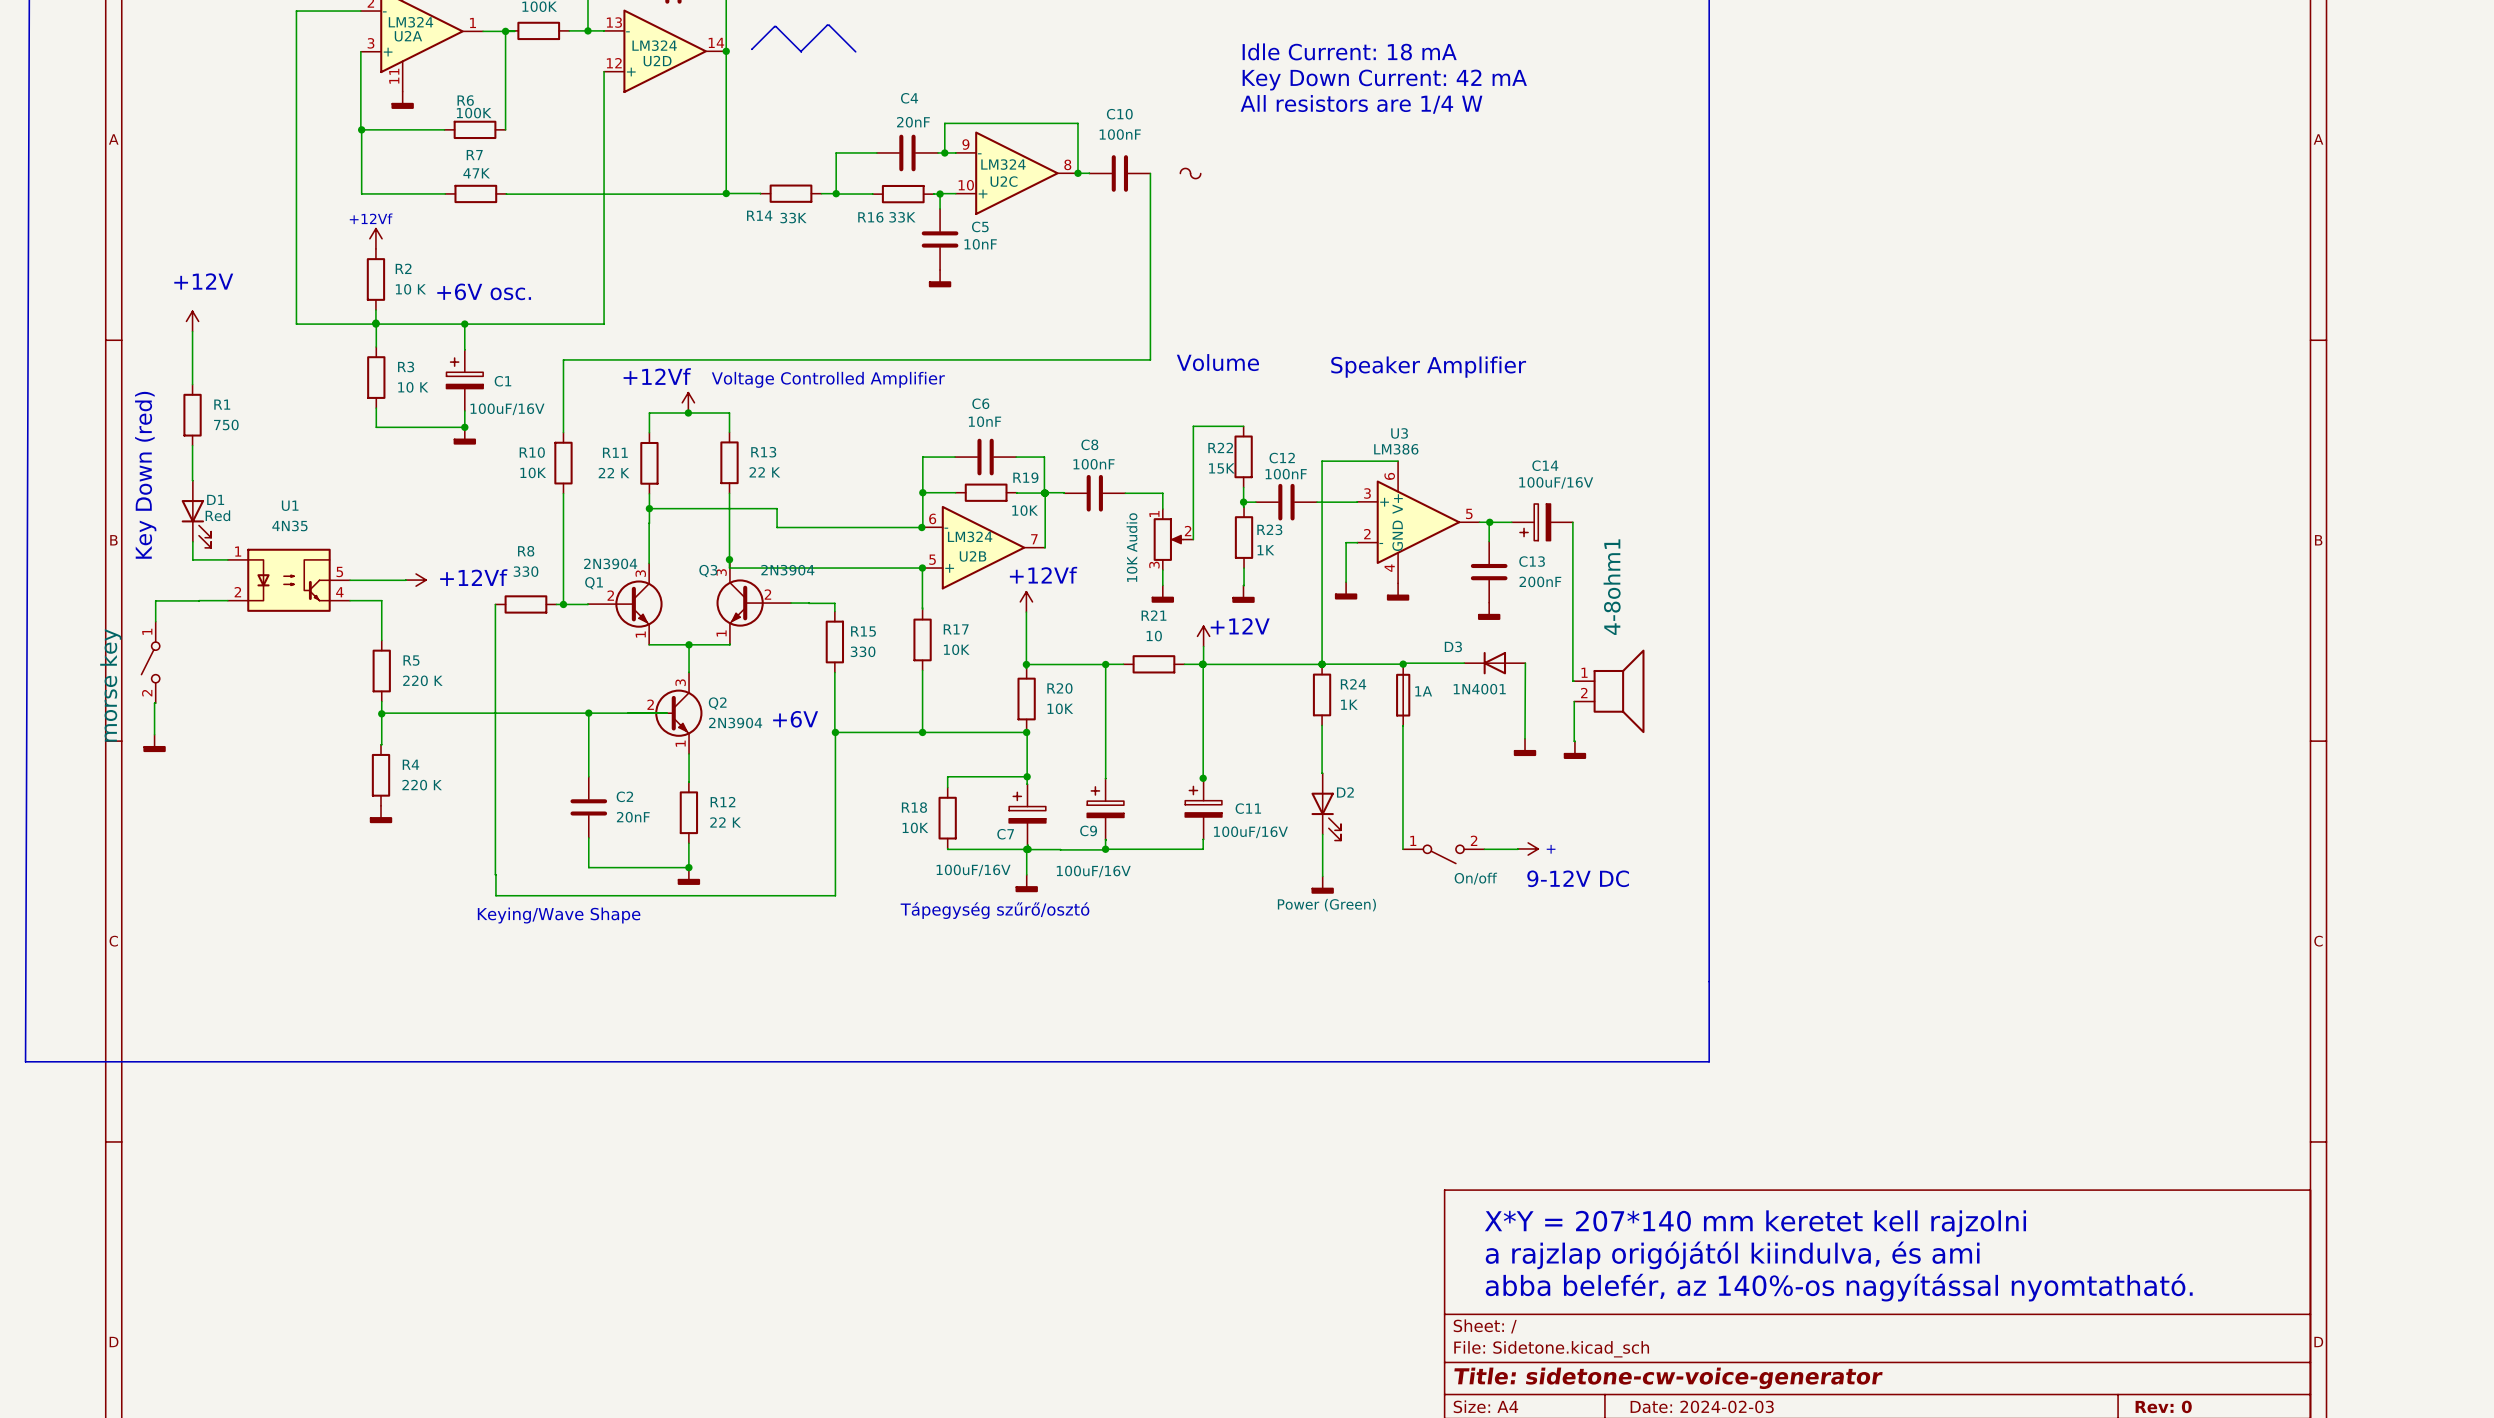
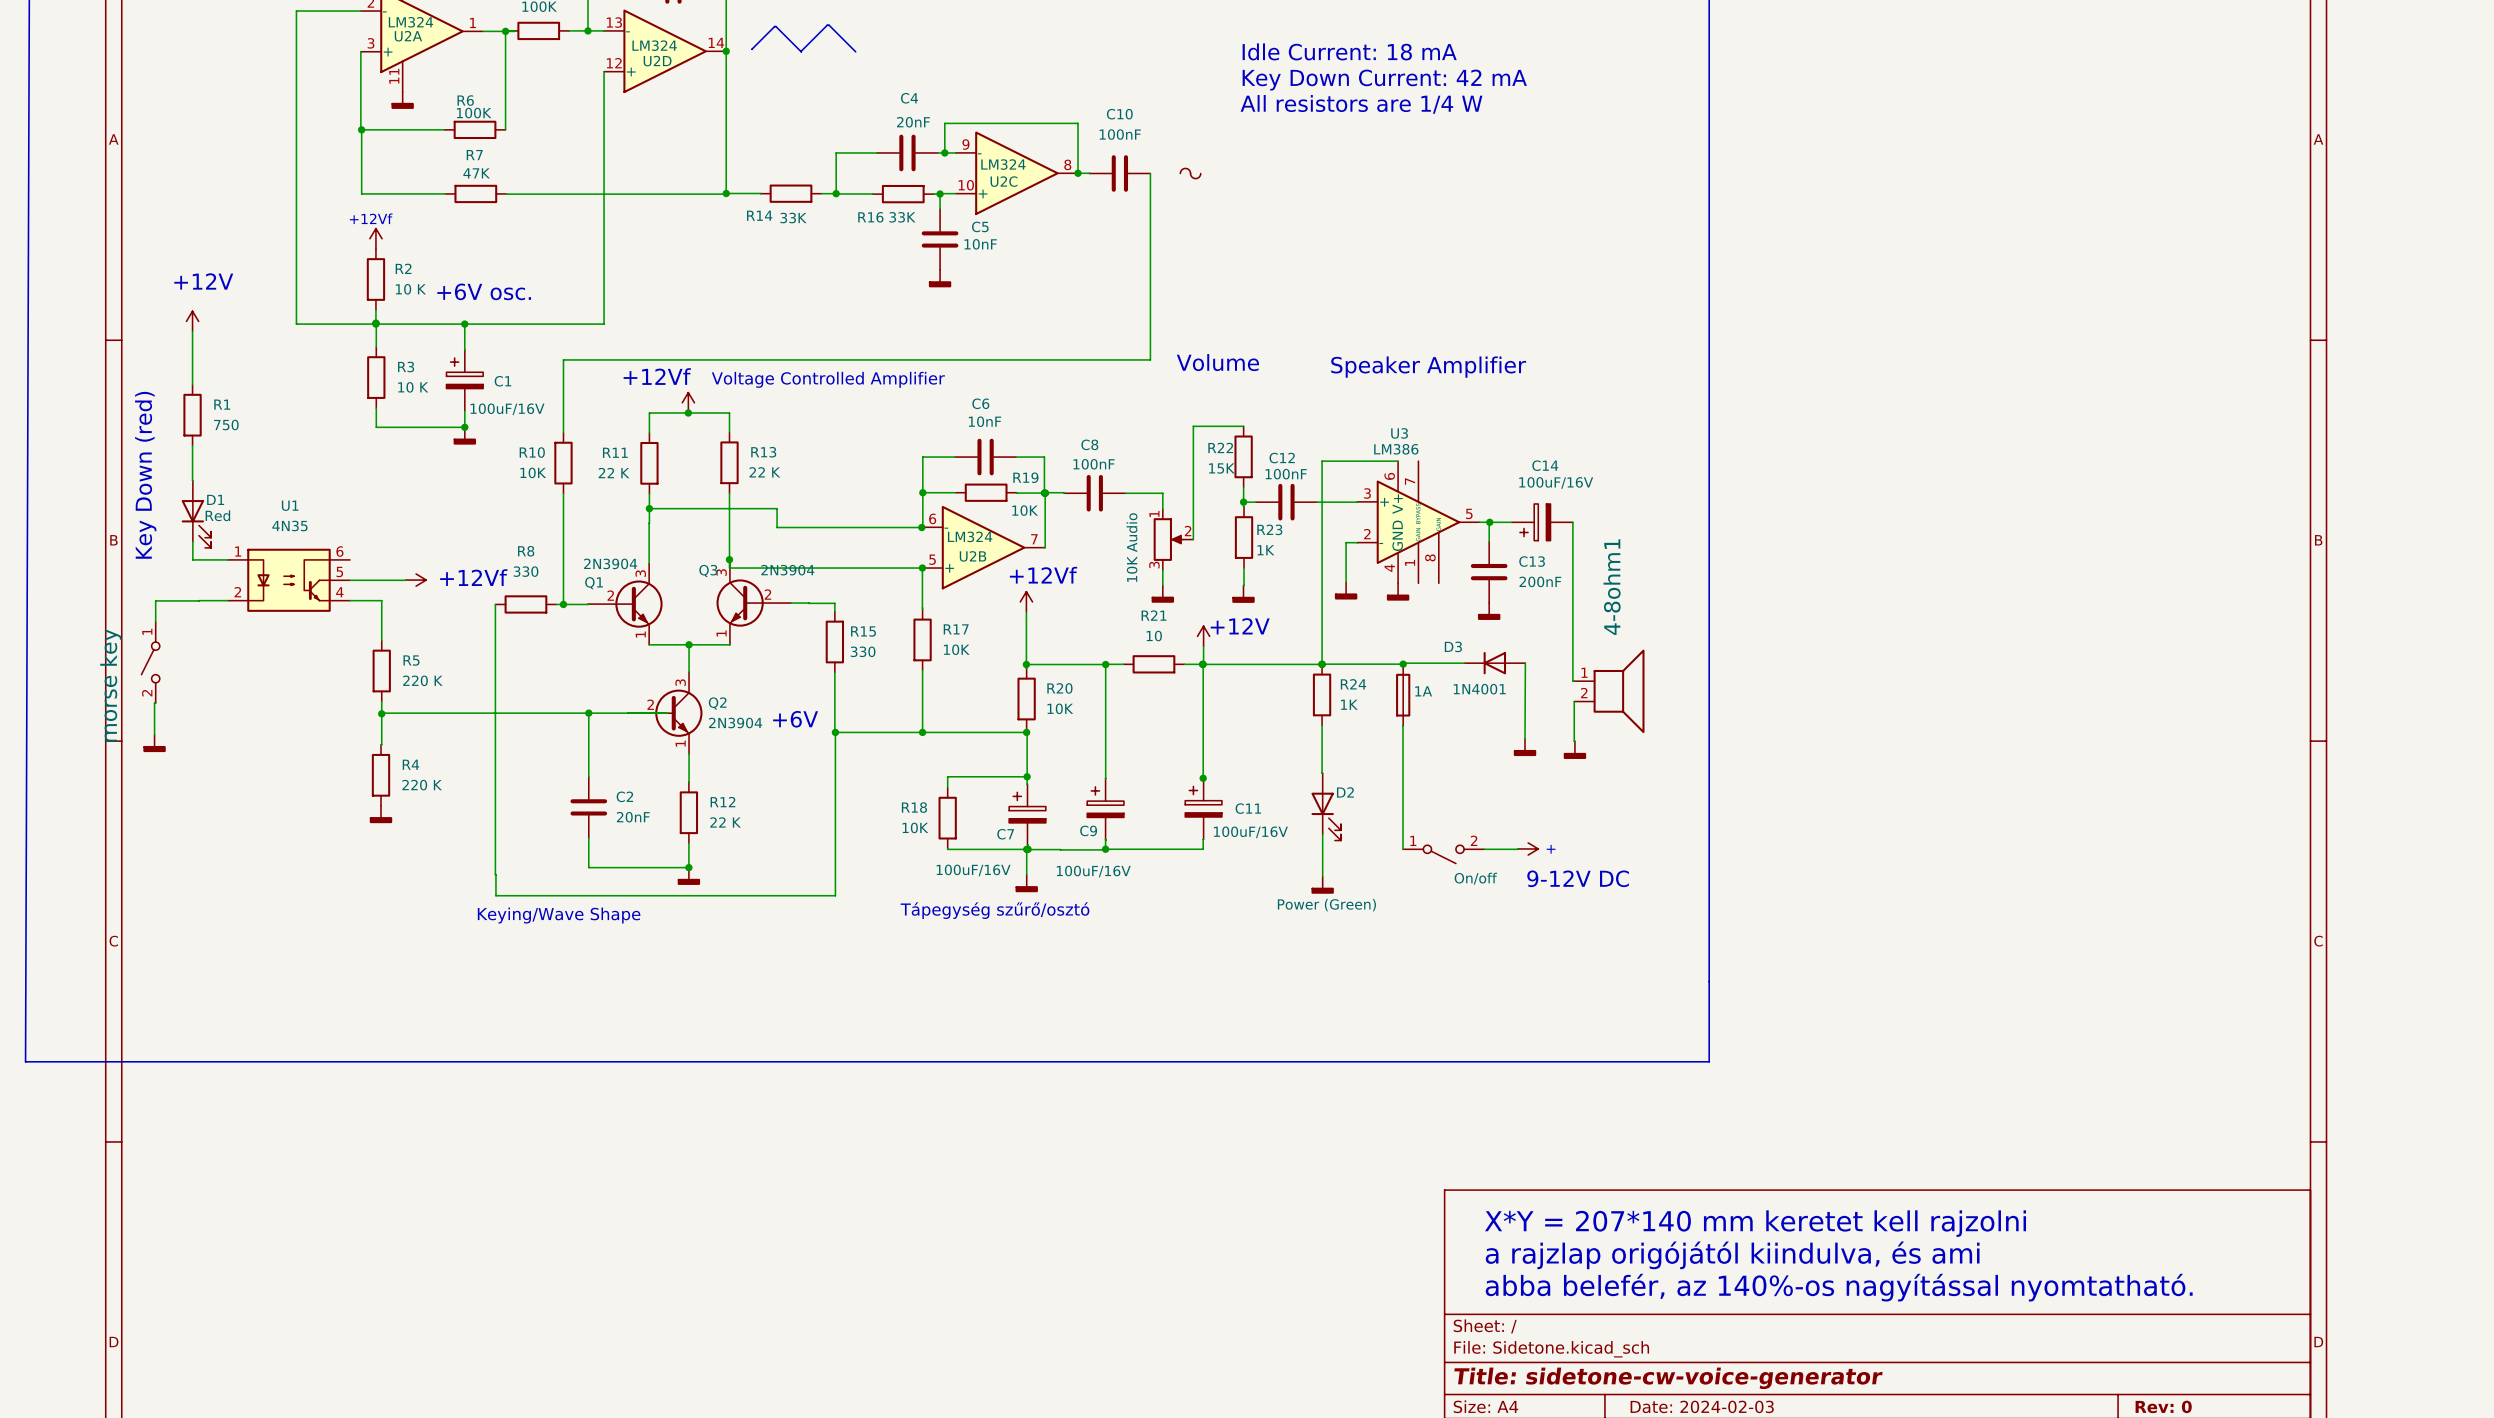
U3 symbol: [1357, 461, 1480, 584] -> [1357, 461, 1480, 584]
U1 symbol: [227, 548, 351, 612] -> [227, 548, 351, 612]

